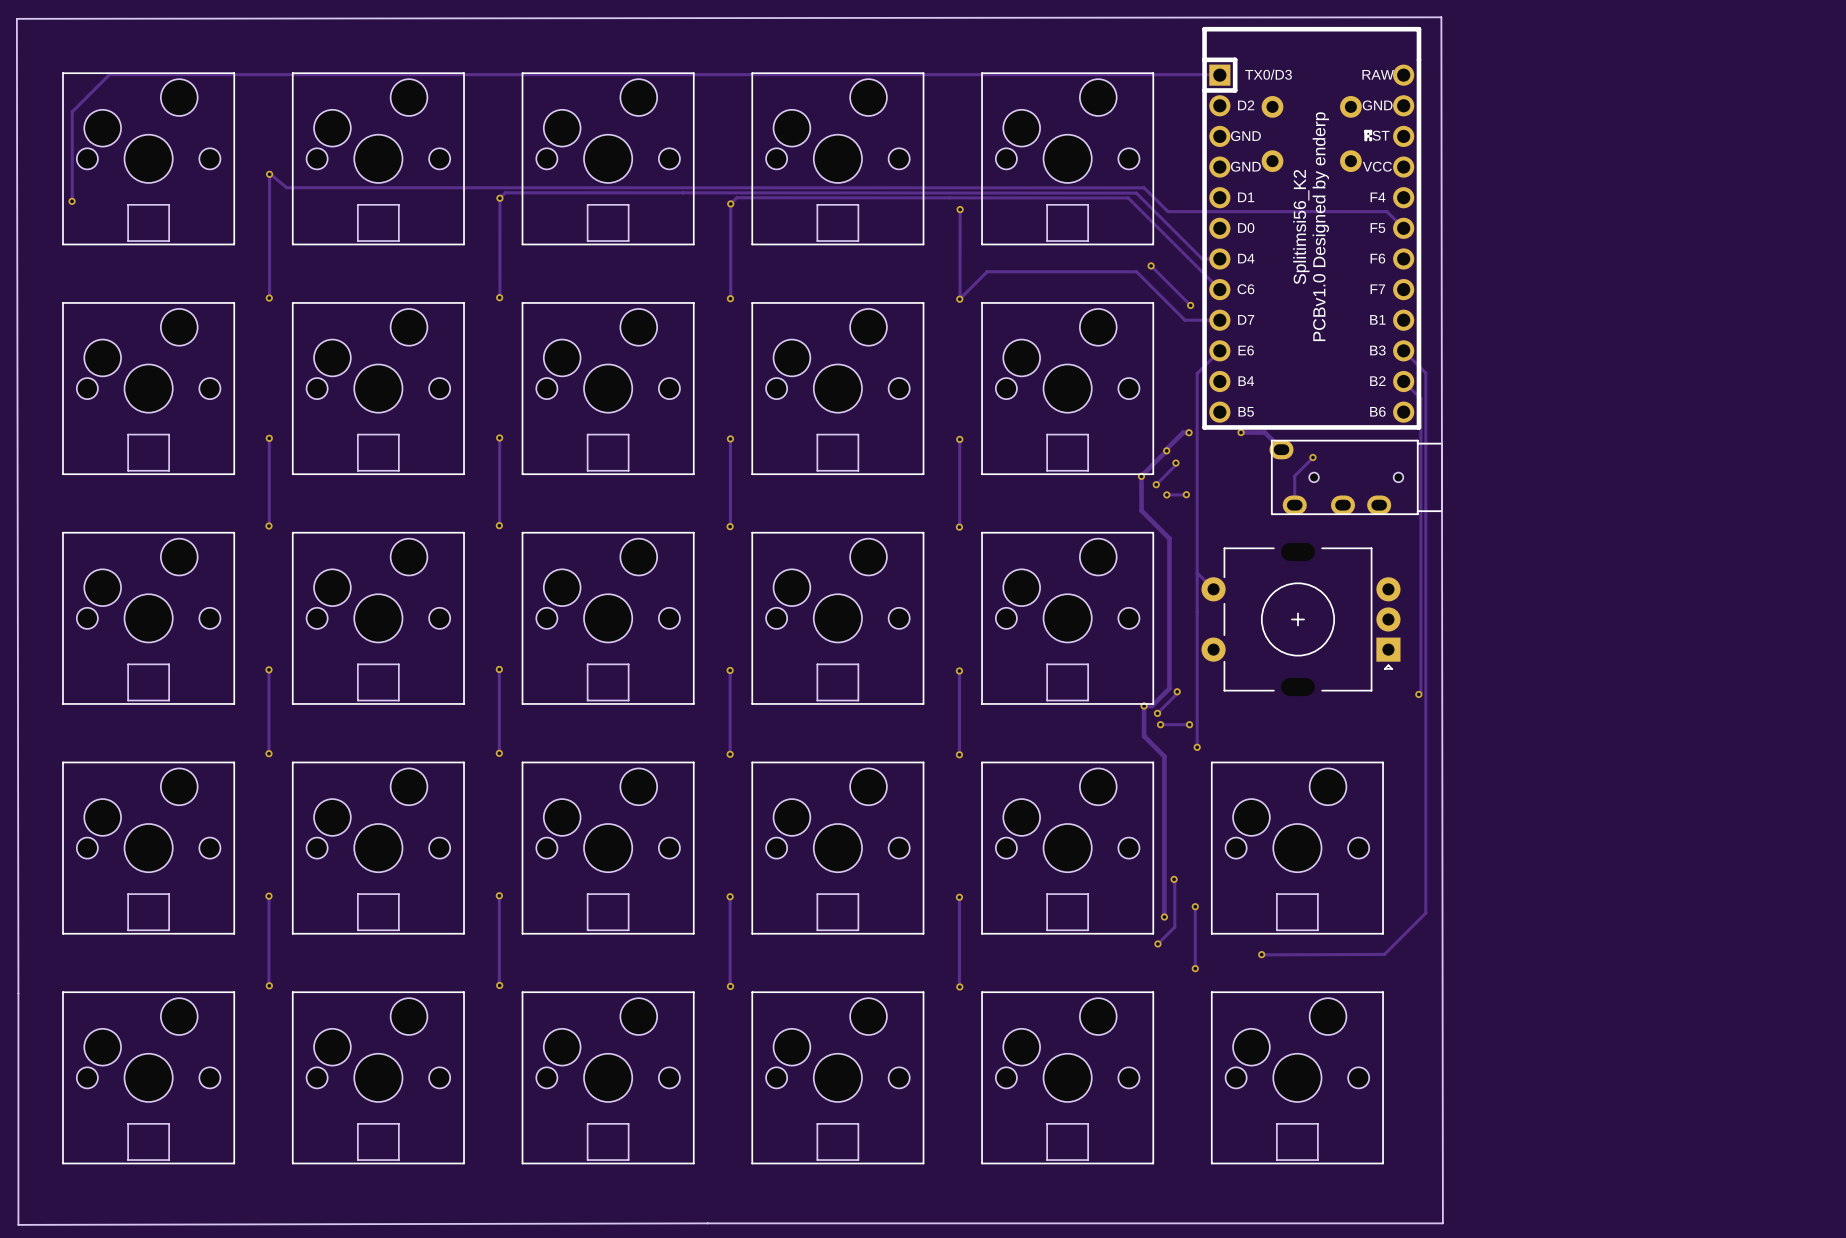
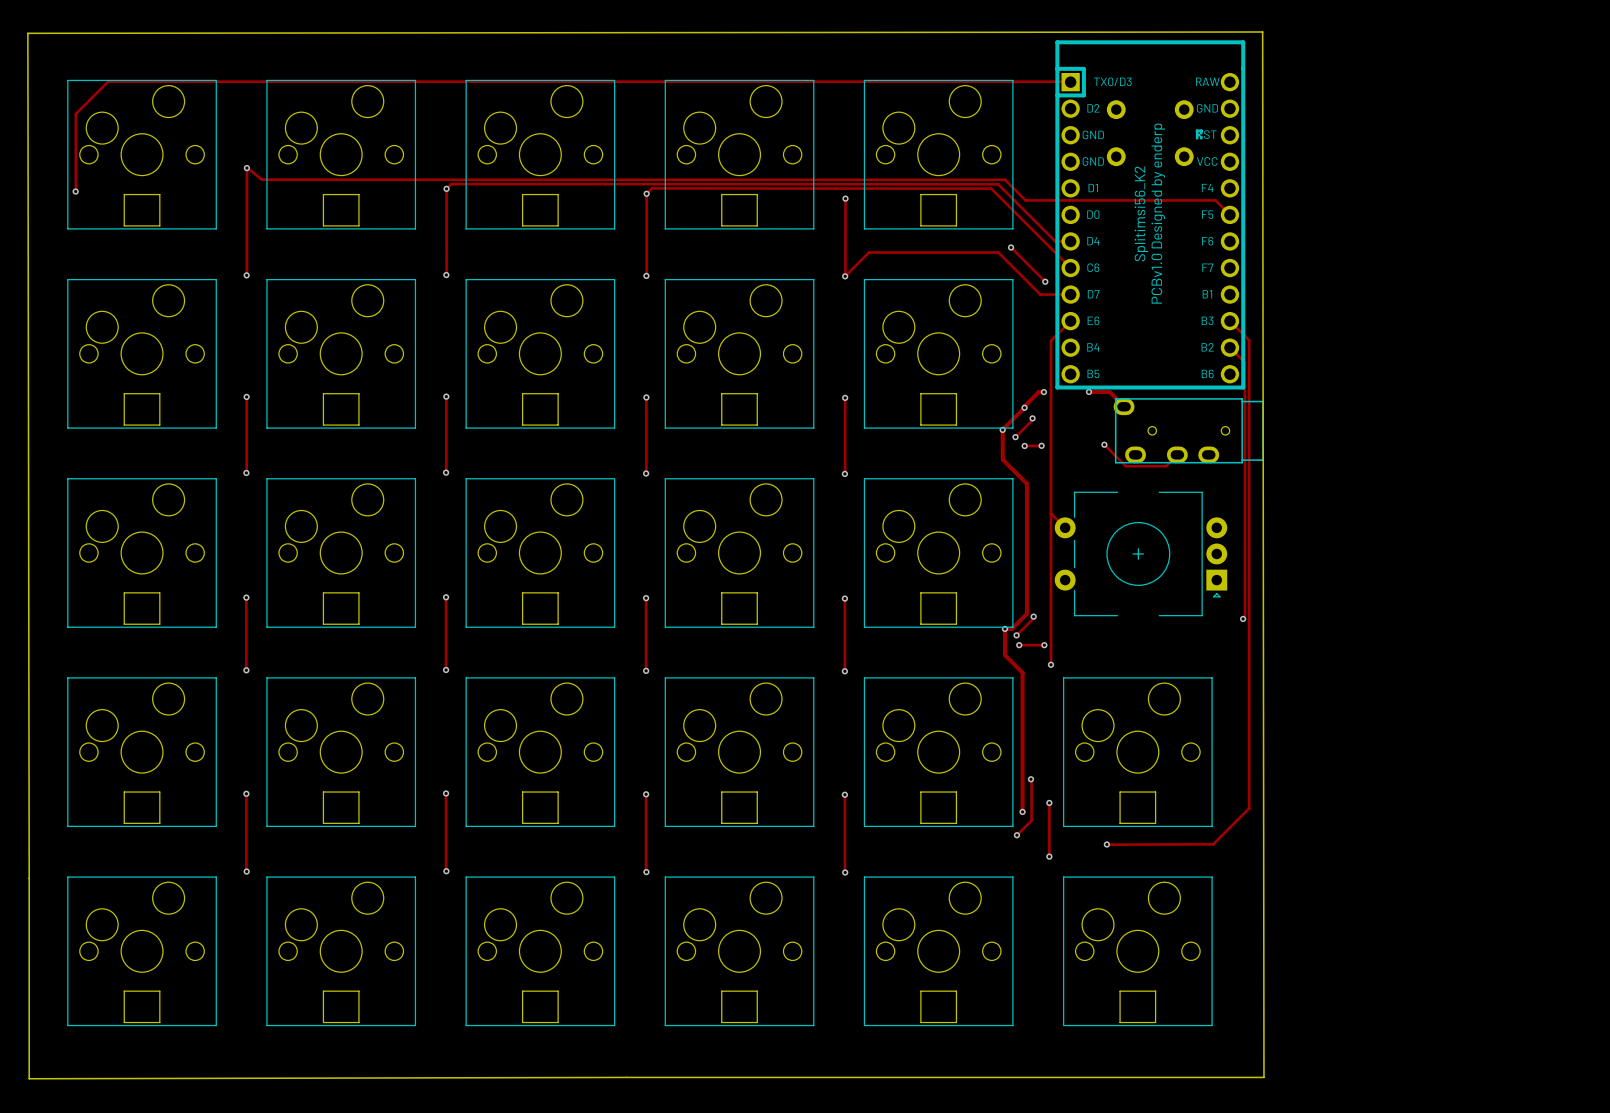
via position: (1312, 457) -> (1104, 444)
track: (1313, 457) (1294, 475) (1294, 505) -> none
track: none -> (1104, 444) (1125, 466) (1166, 466) (1177, 454)

